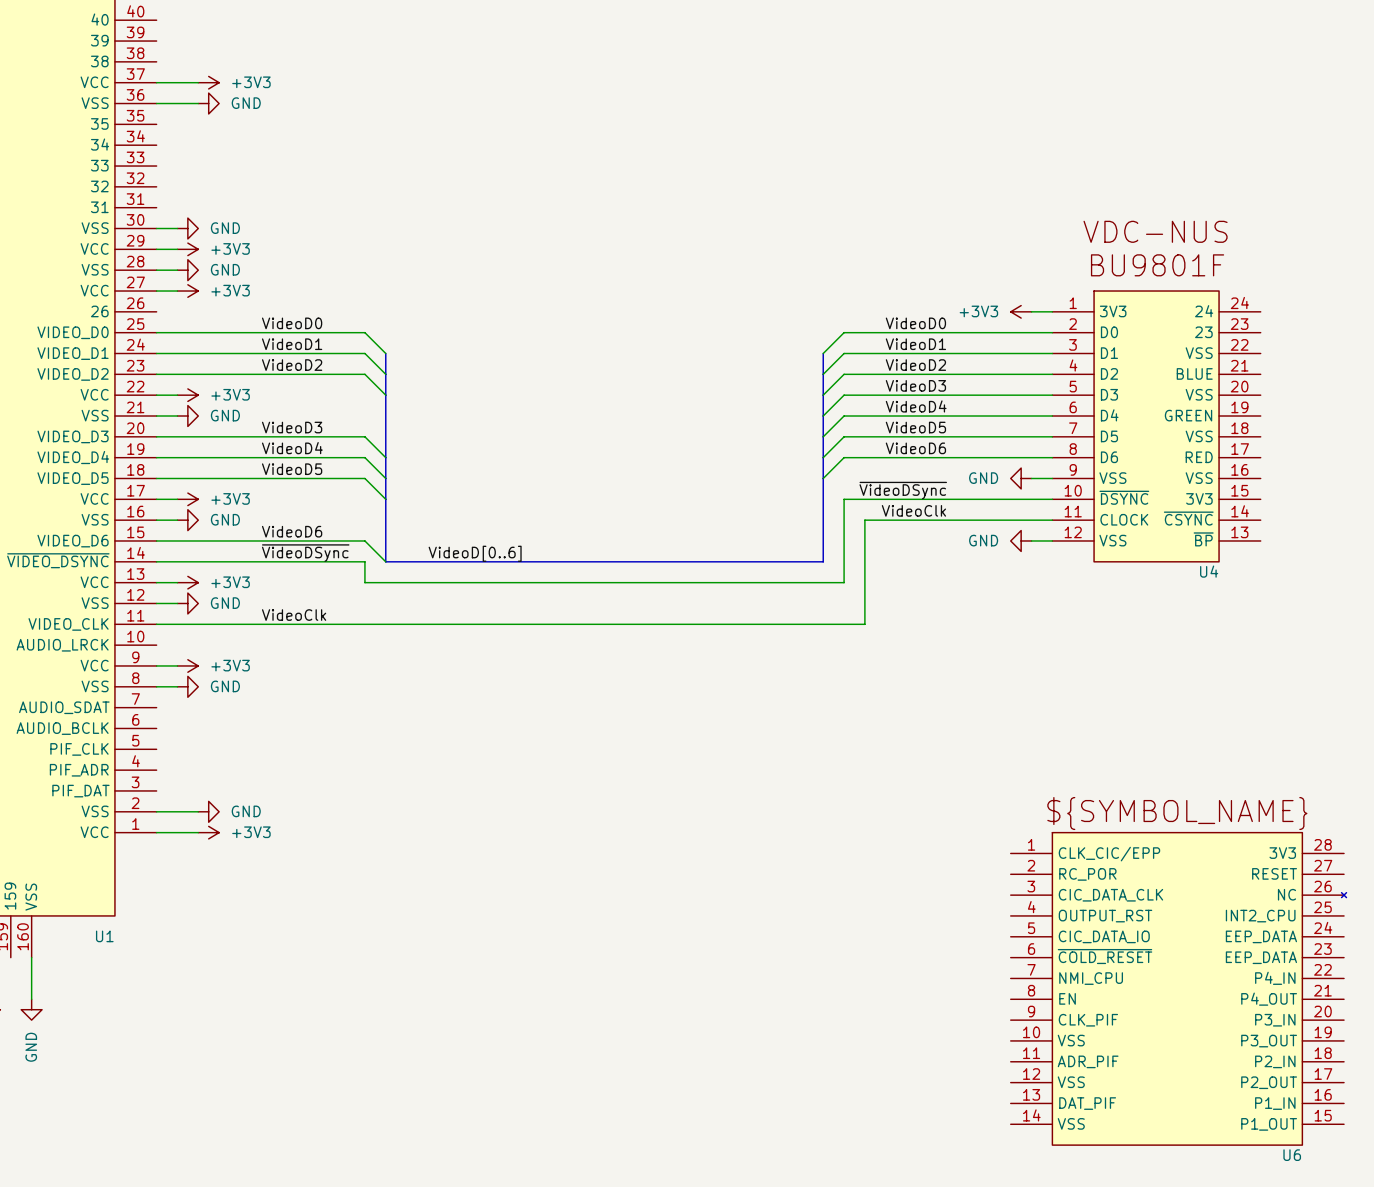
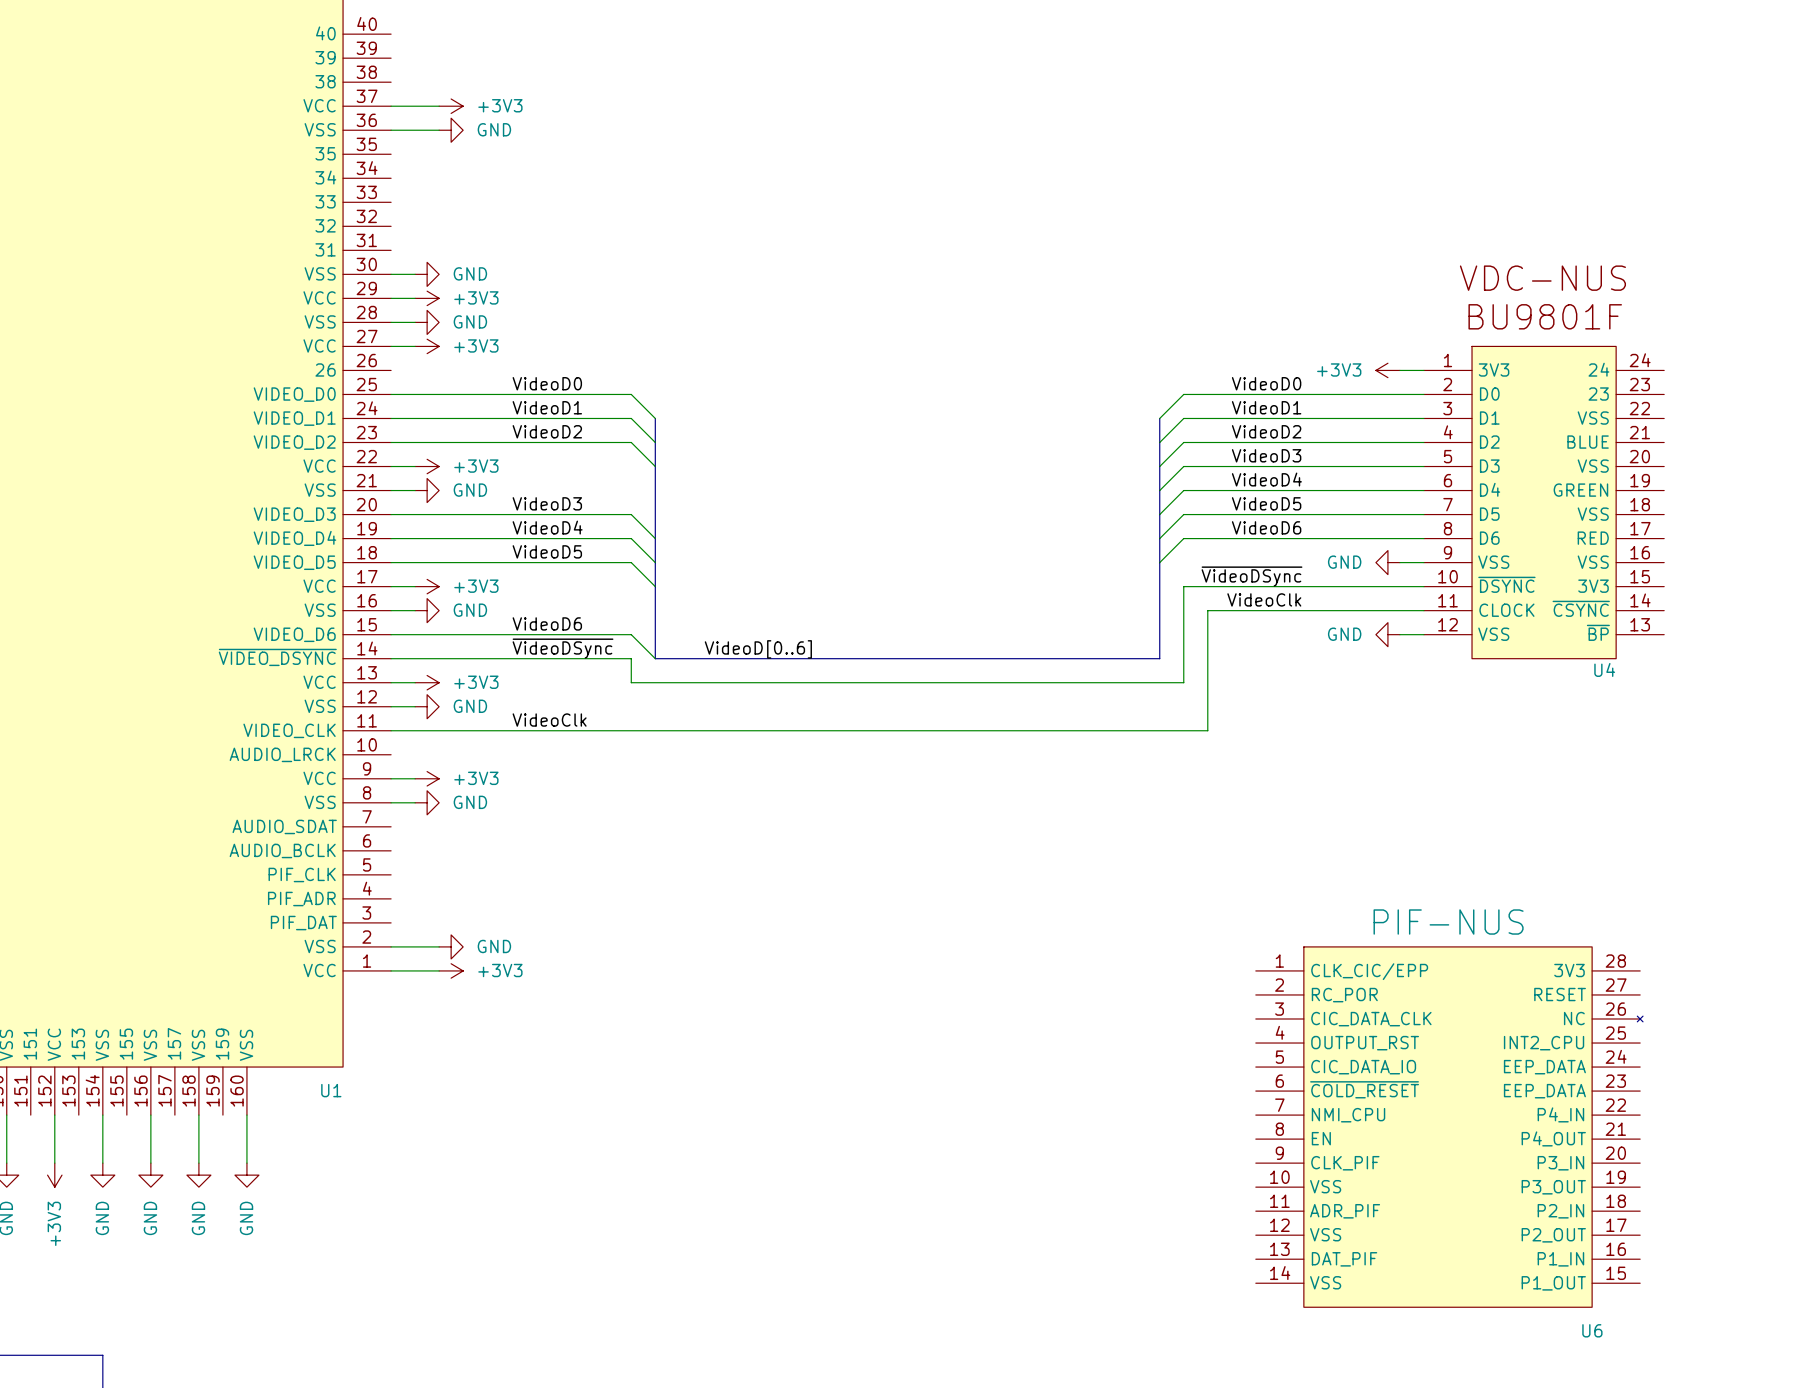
U6 value: none -> PIF-NUS (1448, 922)
U6 text: ${SYMBOL_NAME} (1177, 813) -> none
U6 position: (1178, 988) -> (1449, 1127)
U6 name position: U6 (1292, 1155) -> U6 (1592, 1330)

